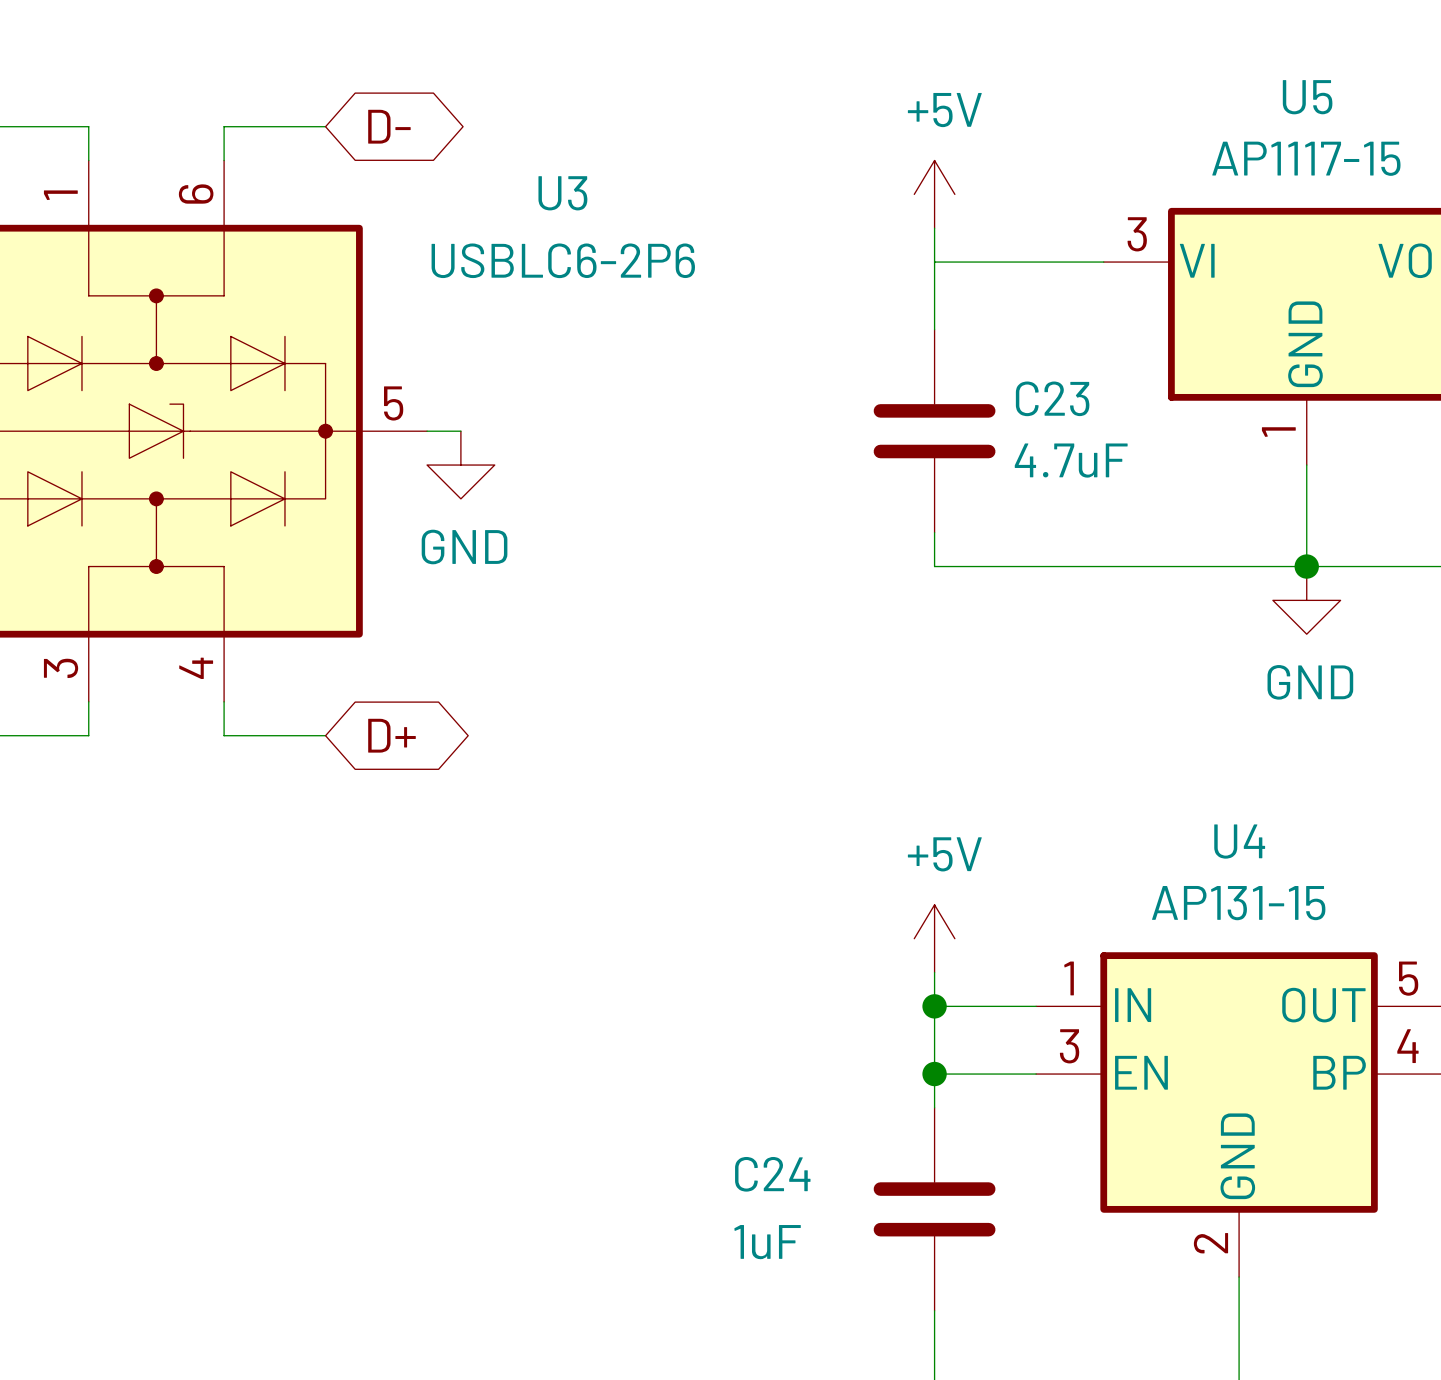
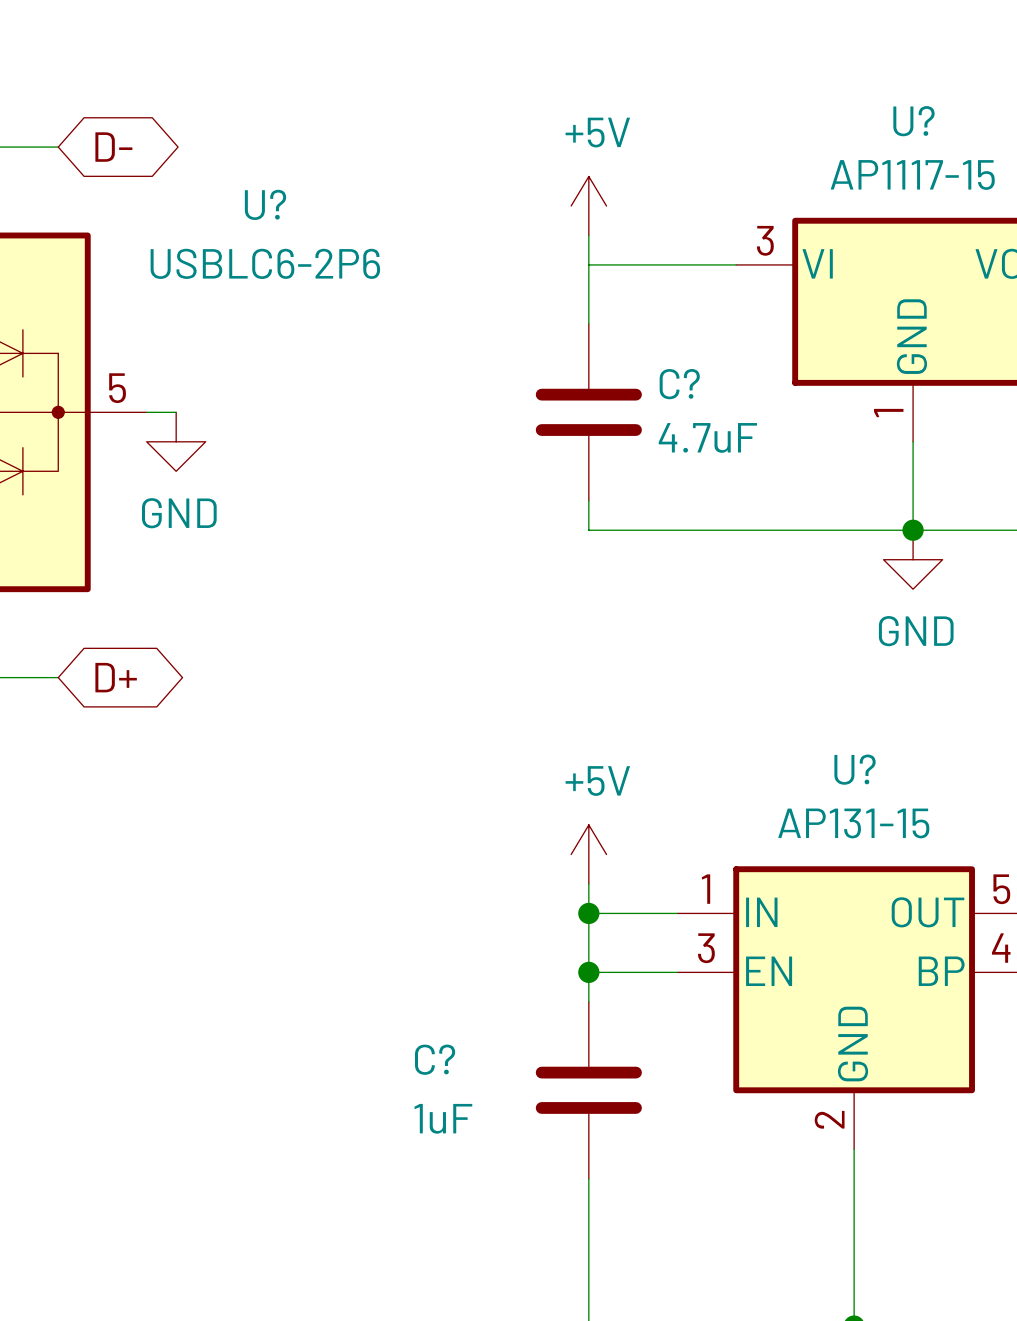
U5 name: U5 (1307, 97) -> U? (913, 121)
U3 name: U3 (562, 193) -> U? (265, 204)
C23 name: C23 (1052, 398) -> C? (679, 384)
U4 name: U4 (1239, 841) -> U? (855, 769)
C24 name: C24 (772, 1174) -> C? (435, 1059)

